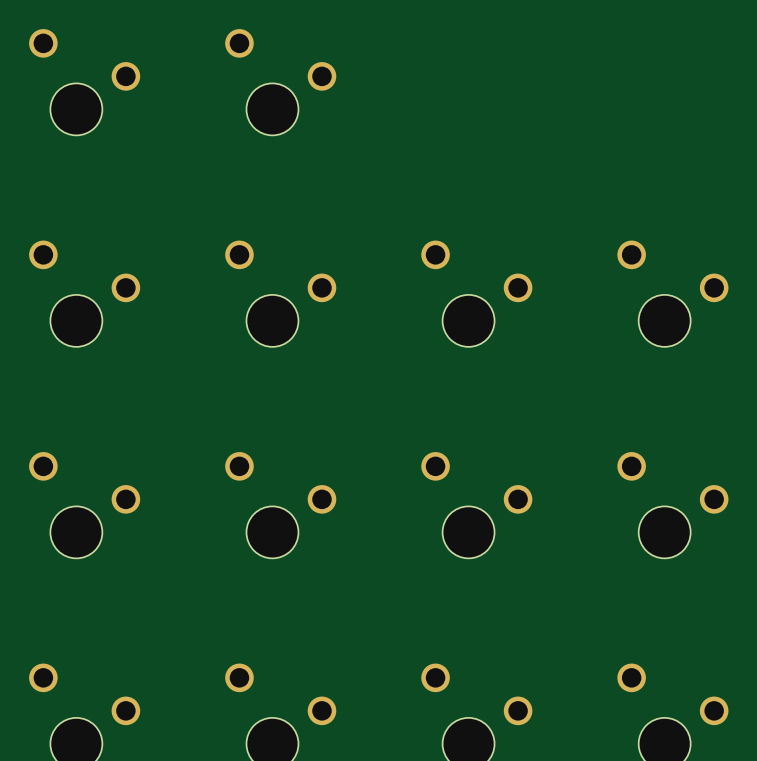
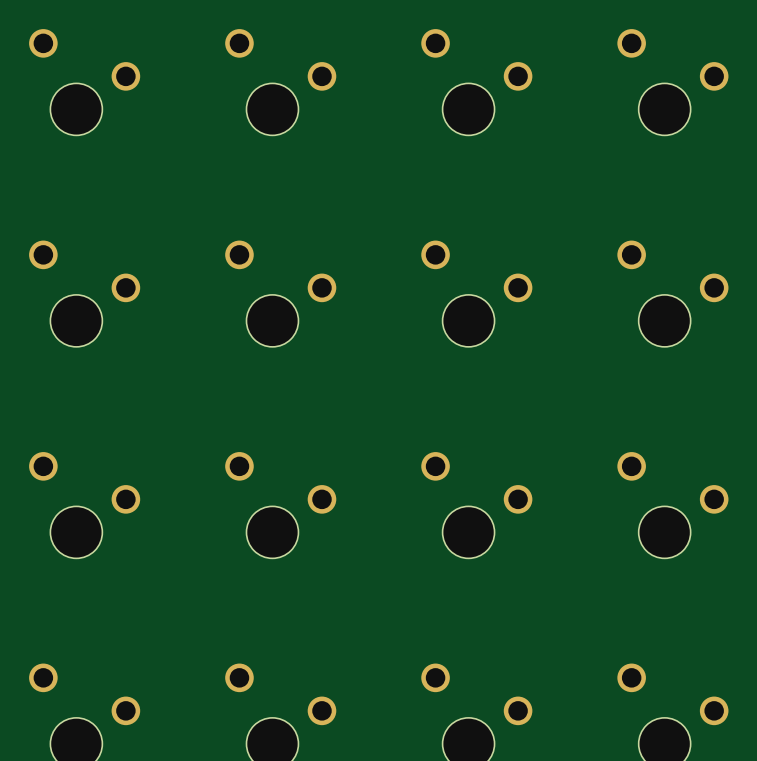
part: none -> (476, 82)
part: none -> (672, 82)

